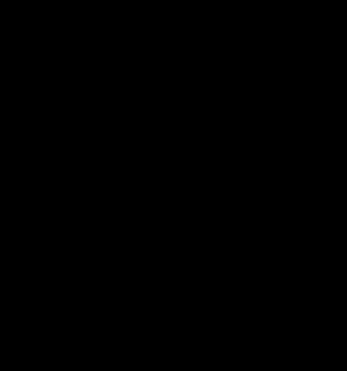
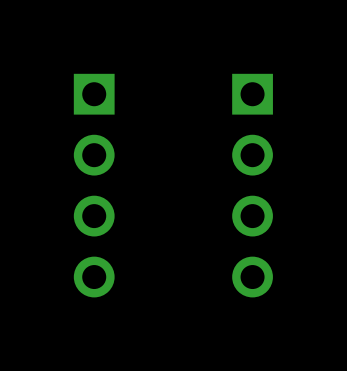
part: none -> (94, 185)
part: none -> (252, 185)

